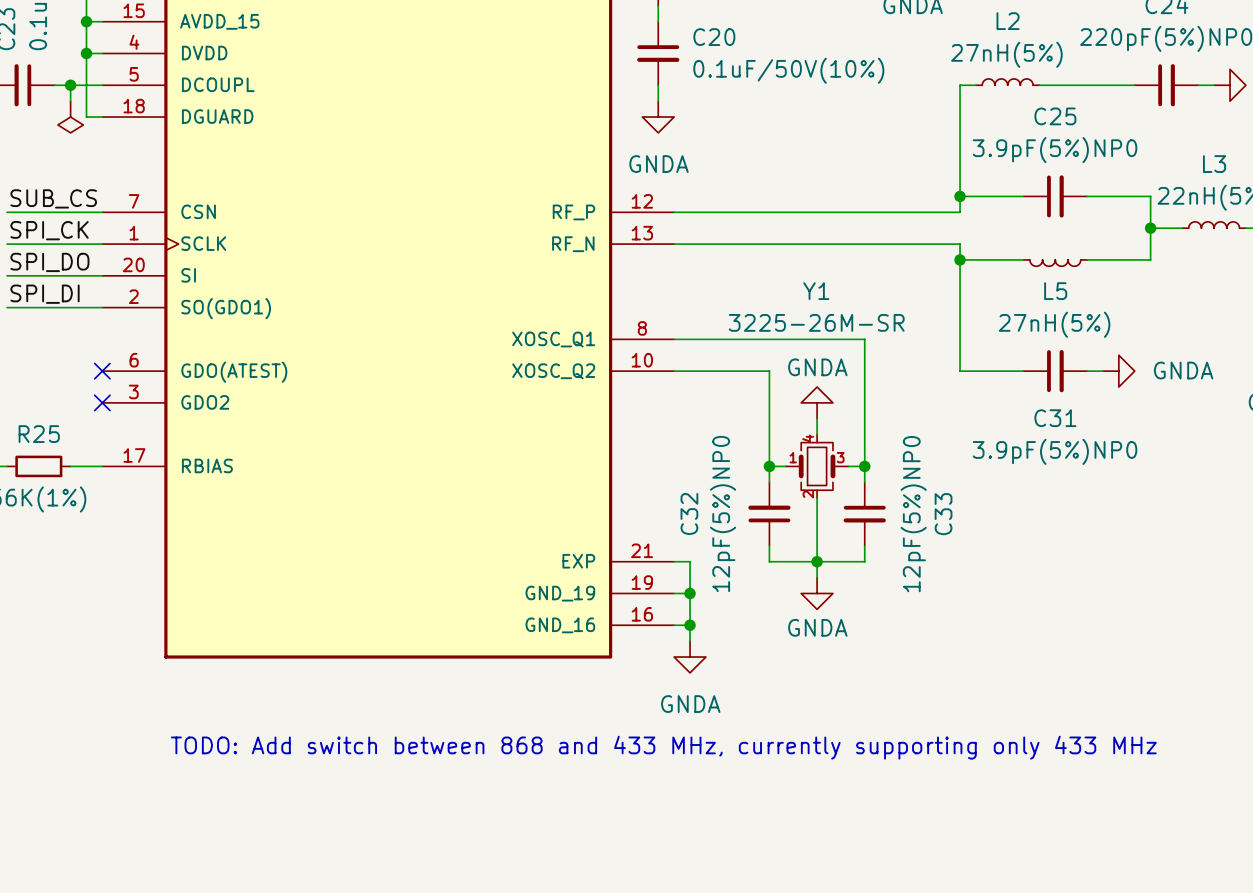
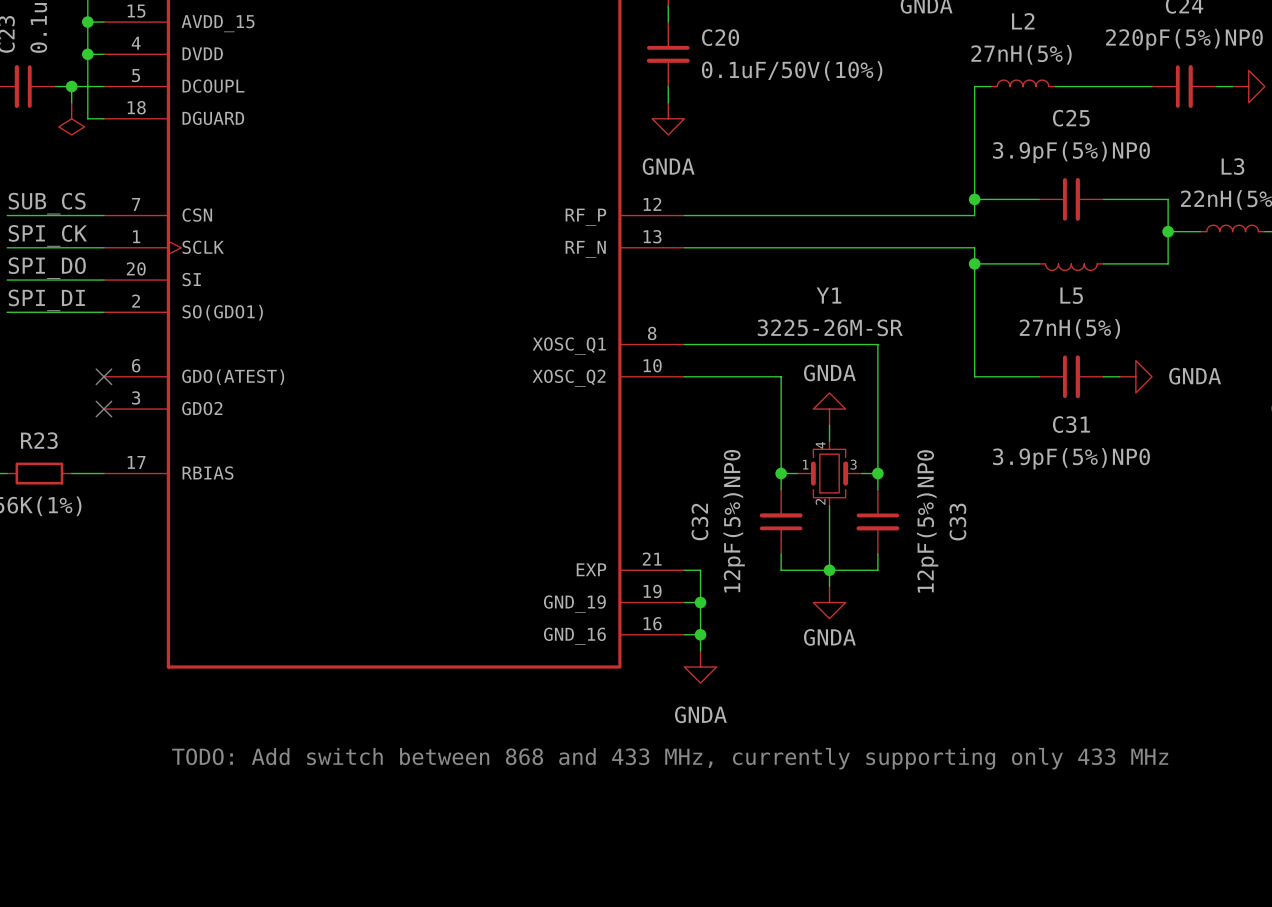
R25 name: R25 (39, 434) -> R23 (39, 440)

